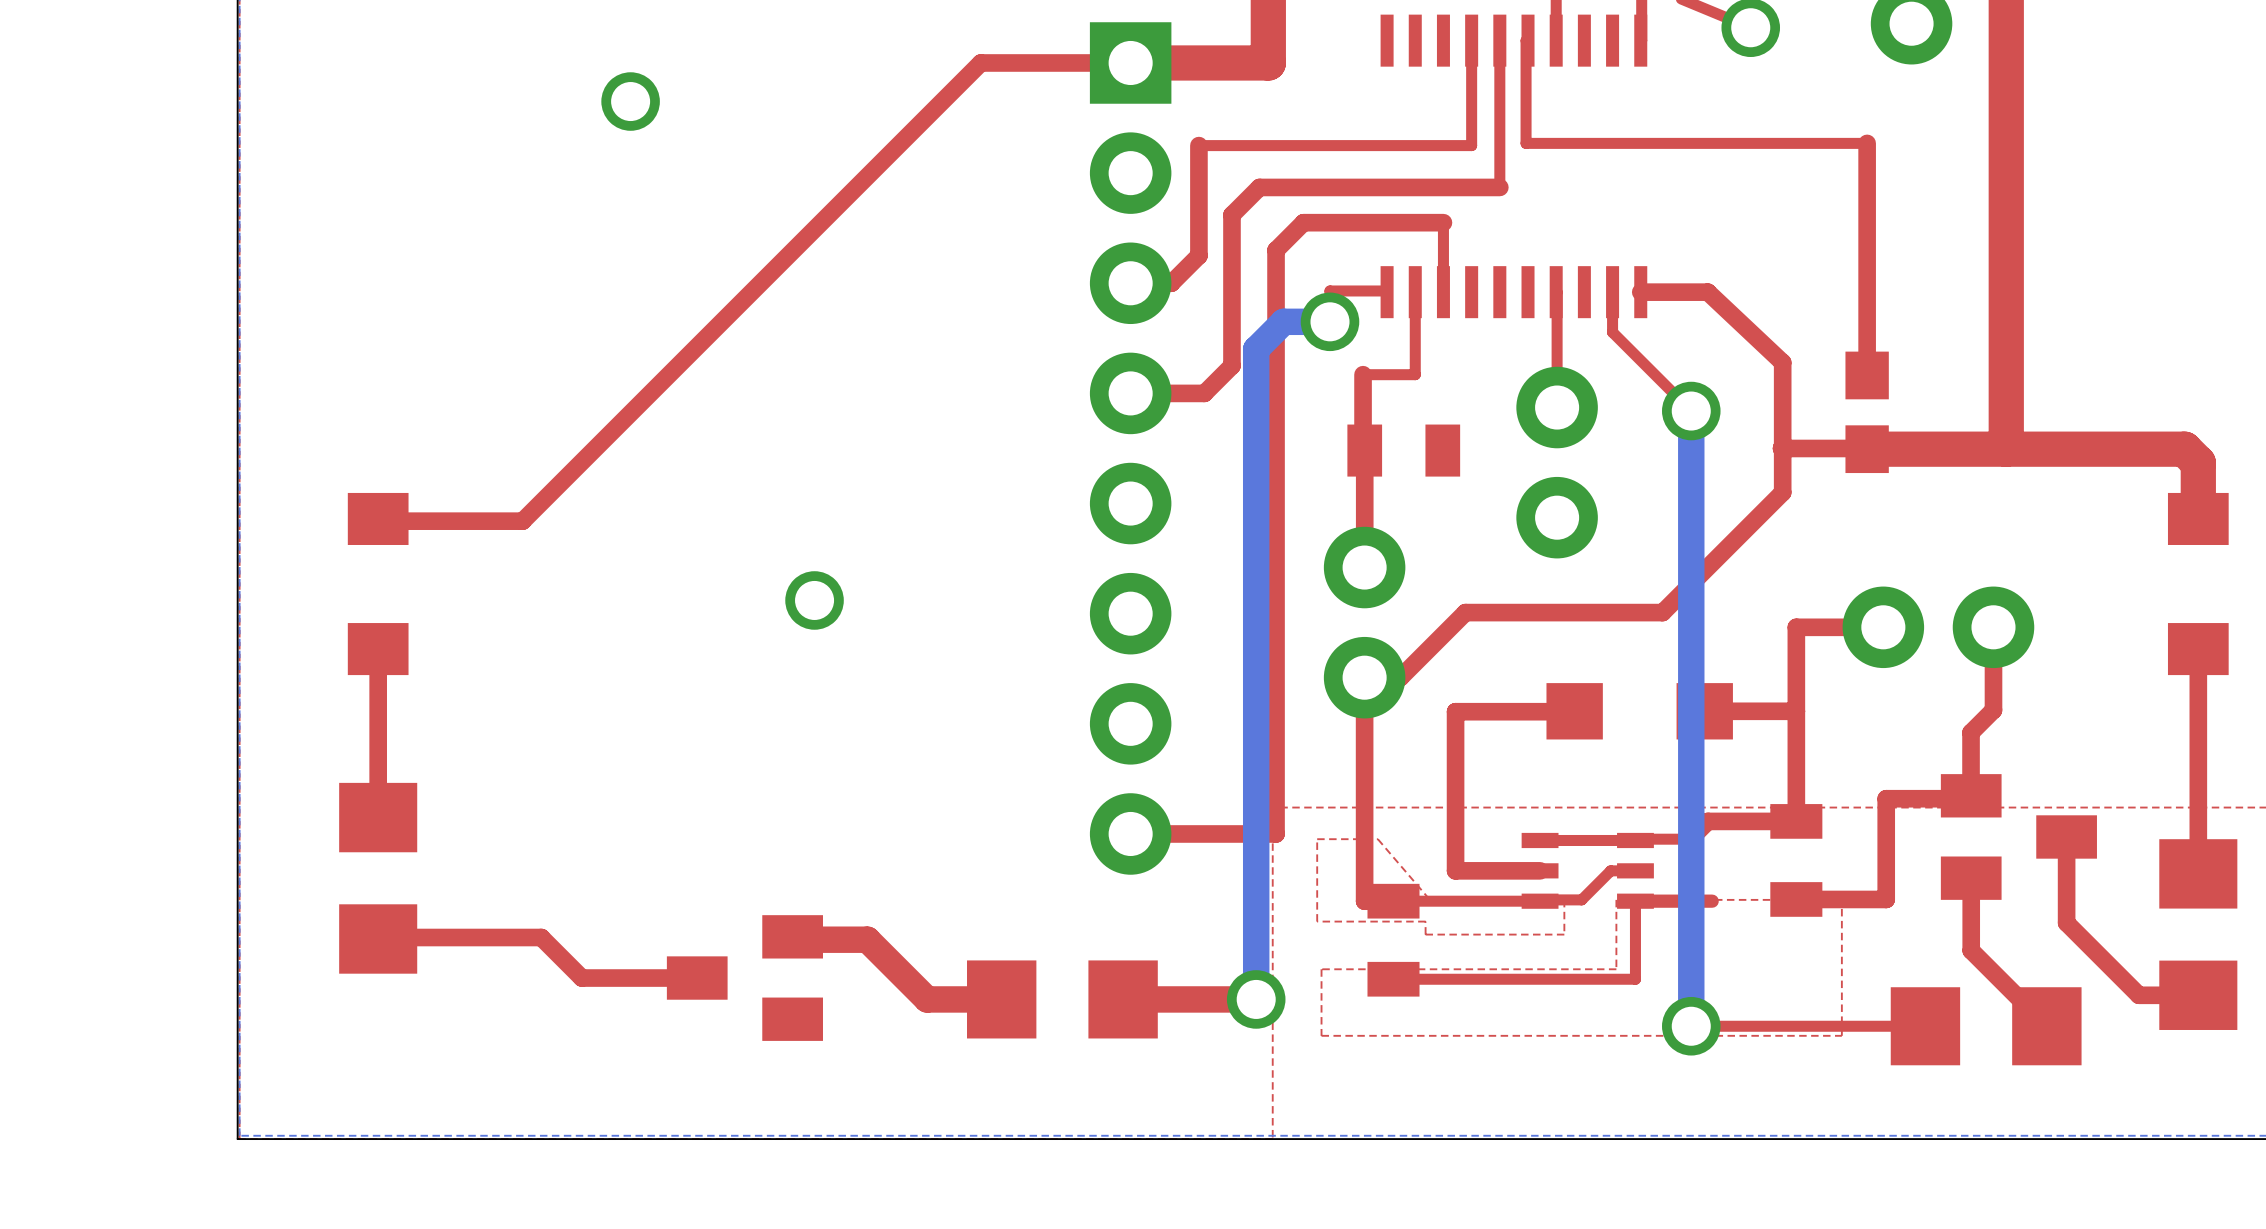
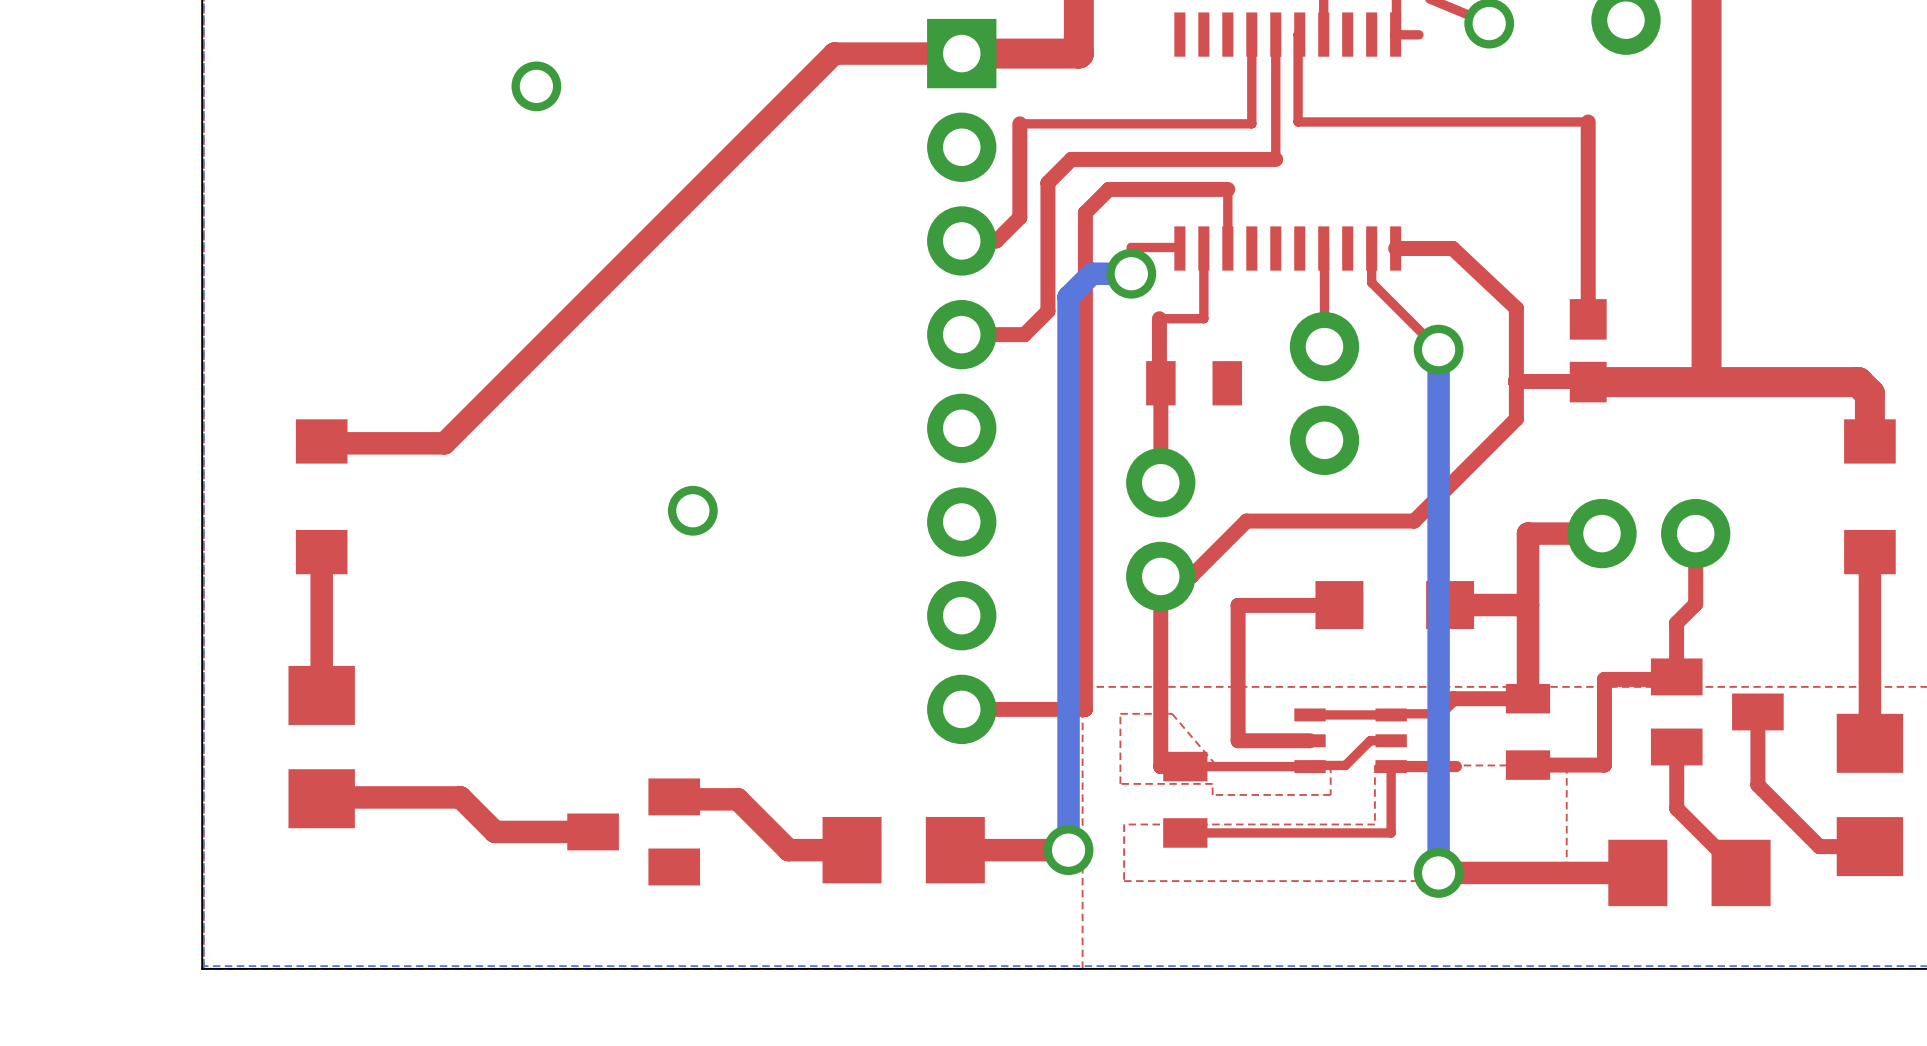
top track: none -> (1418, 34) (1394, 34)
top track width: thin (1130, 62) (980, 62) (522, 521) (380, 521) -> thick (961, 53) (834, 53) (444, 443) (323, 443)
top track width: thin (1883, 627) (1796, 627) (1796, 821) -> thick (1602, 533) (1527, 533) (1527, 698)
top track width: thin (378, 649) (378, 817) -> thick (321, 552) (321, 695)
top track width: thin (2198, 649) (2198, 873) -> thick (1869, 552) (1869, 743)
top track width: thin (1796, 711) (1704, 711) -> thick (1527, 605) (1450, 605)
top track width: thin (379, 937) (541, 937) (581, 978) (697, 978) -> thick (322, 797) (460, 797) (494, 831) (593, 831)
top track width: thin (1925, 1026) (1691, 1026) -> thick (1637, 872) (1438, 872)

